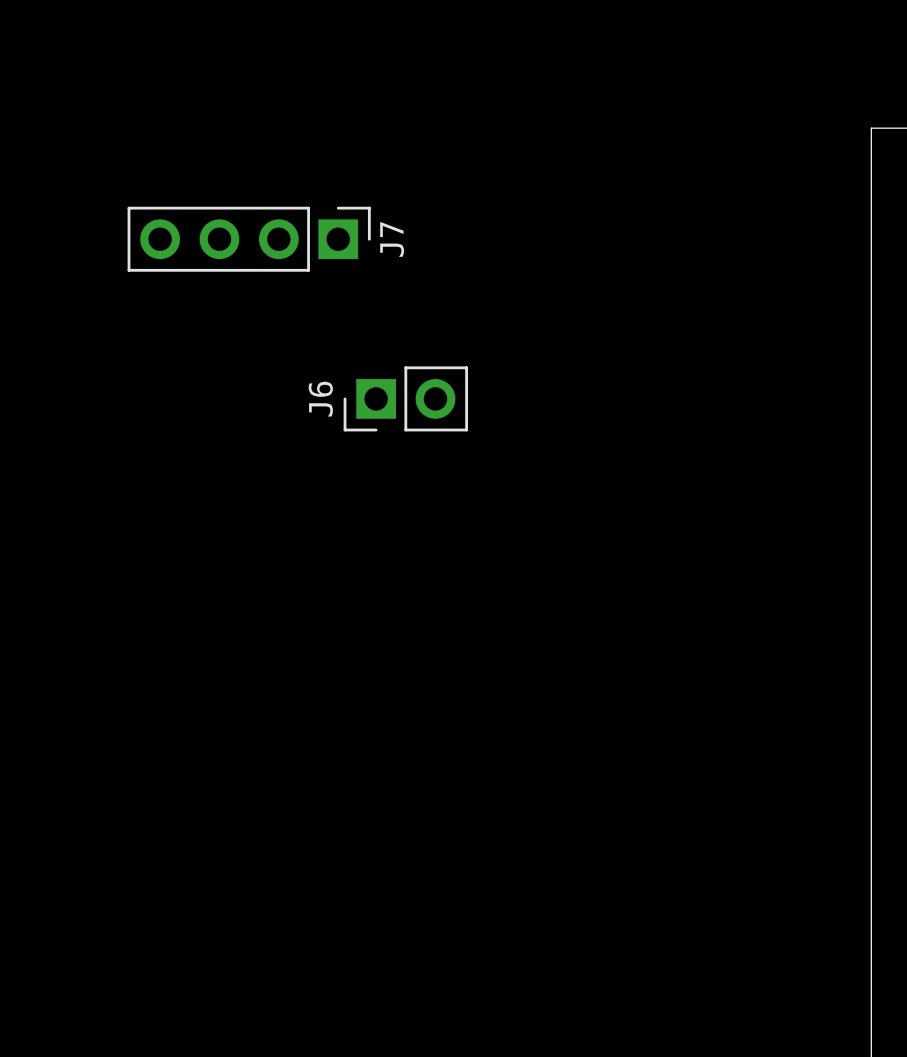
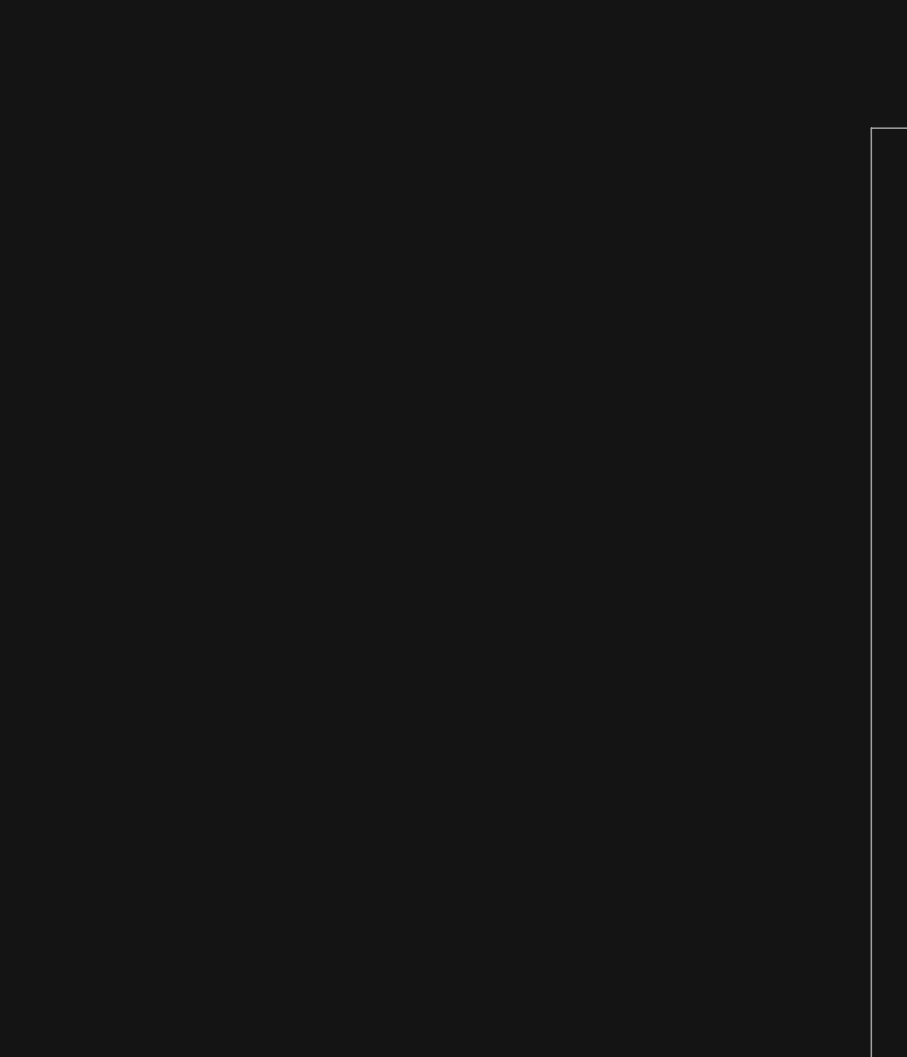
J7: (249, 239) -> none
J6: (405, 398) -> none

